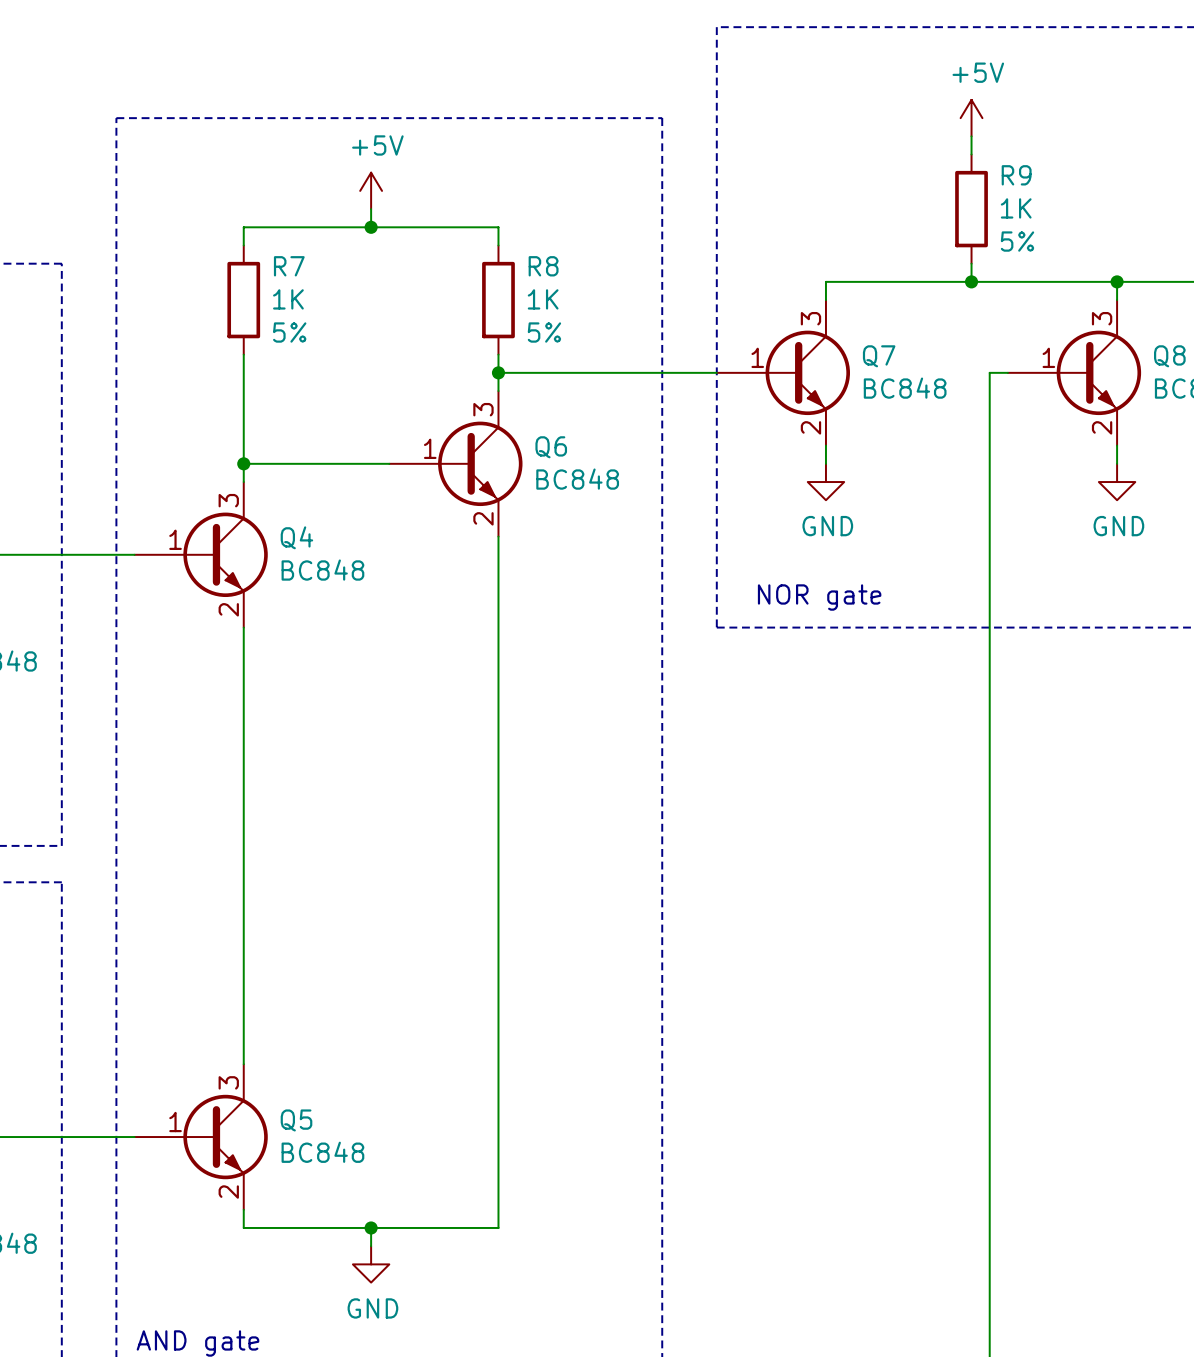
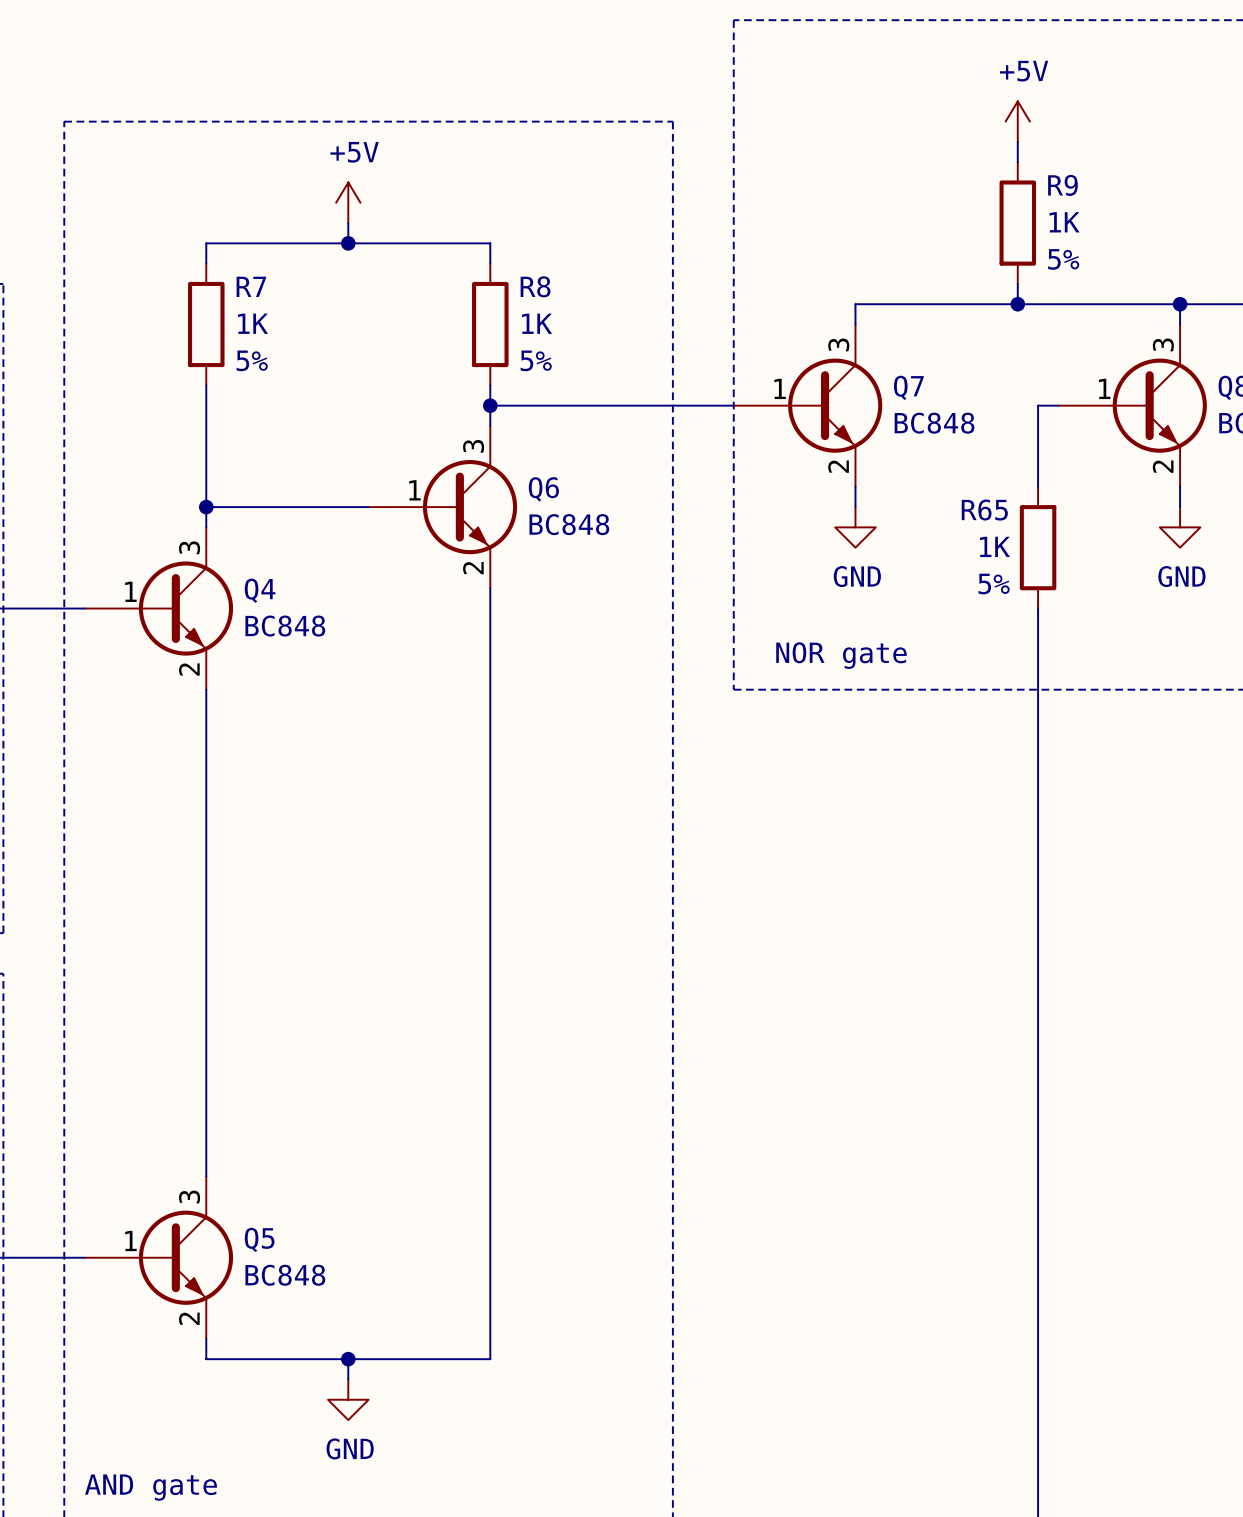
wire: (989, 445) (989, 554) -> none
R65: none -> 1K (1038, 547)

